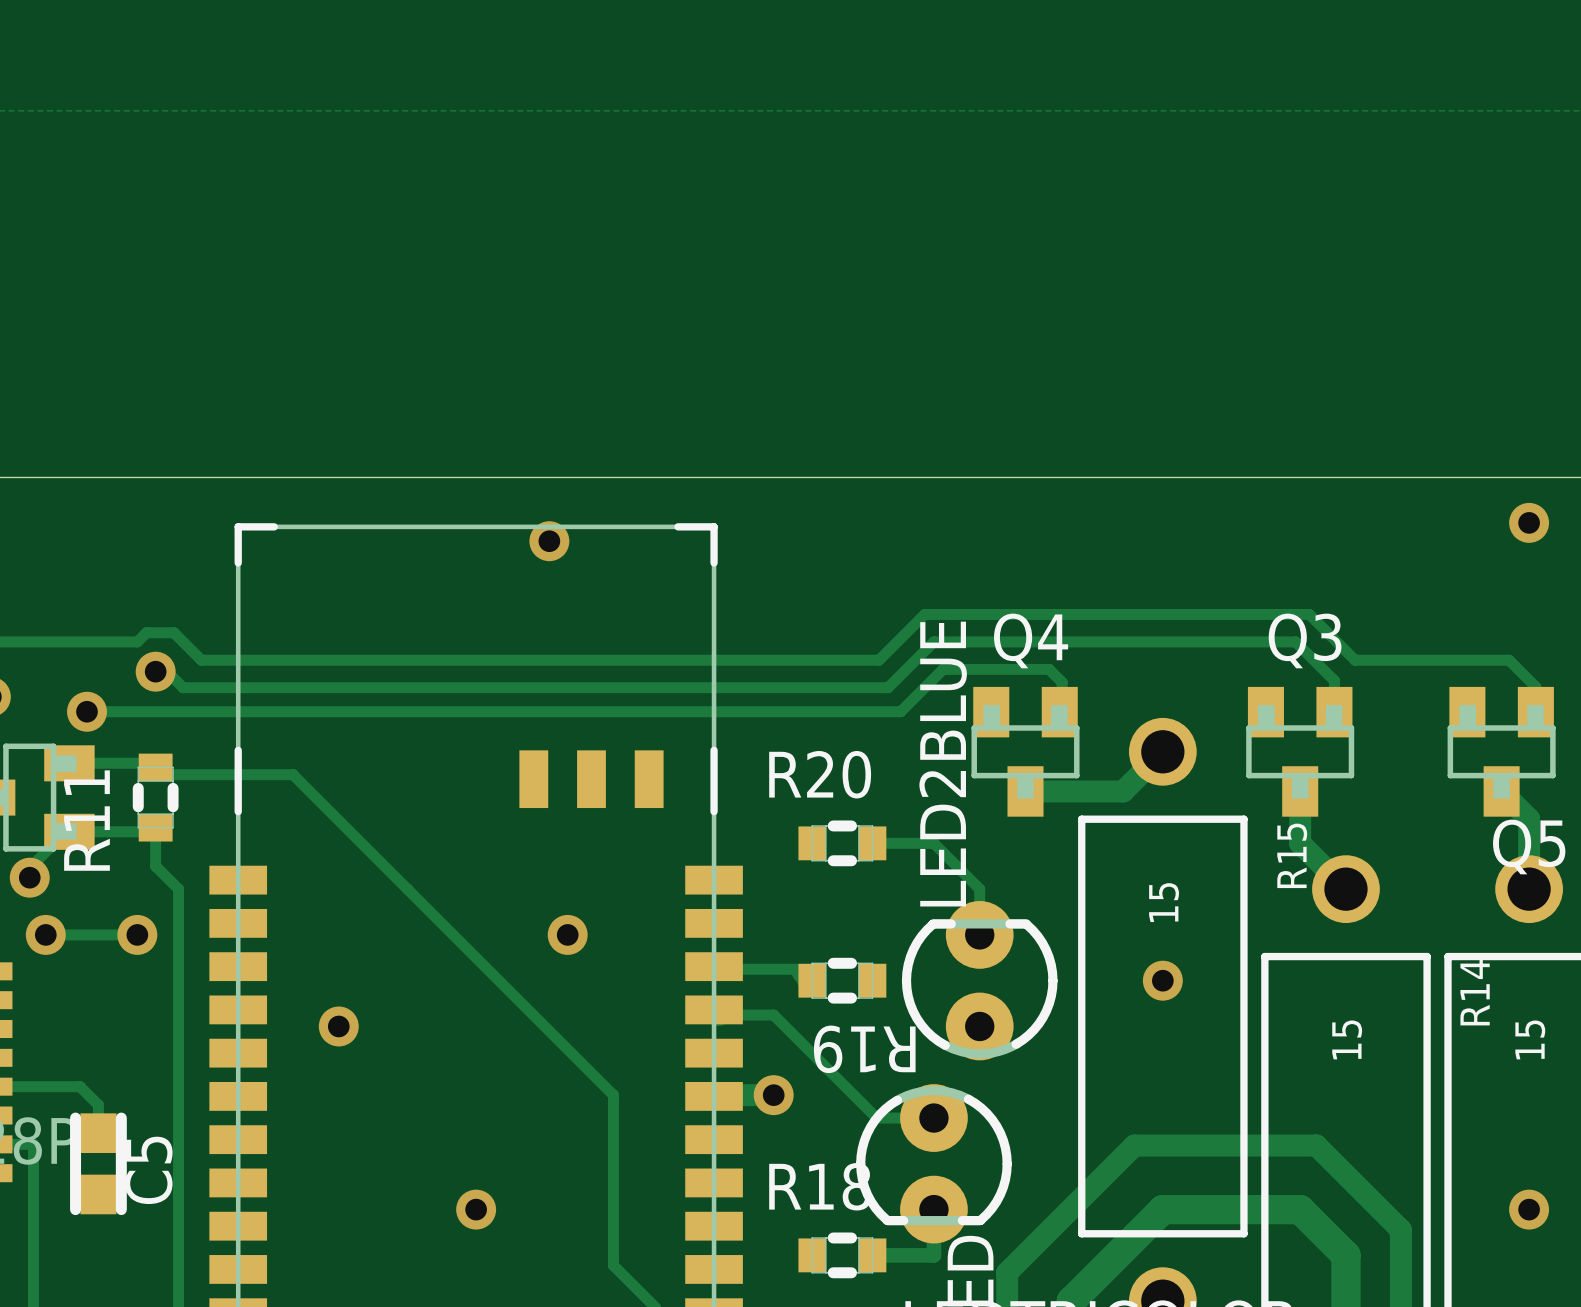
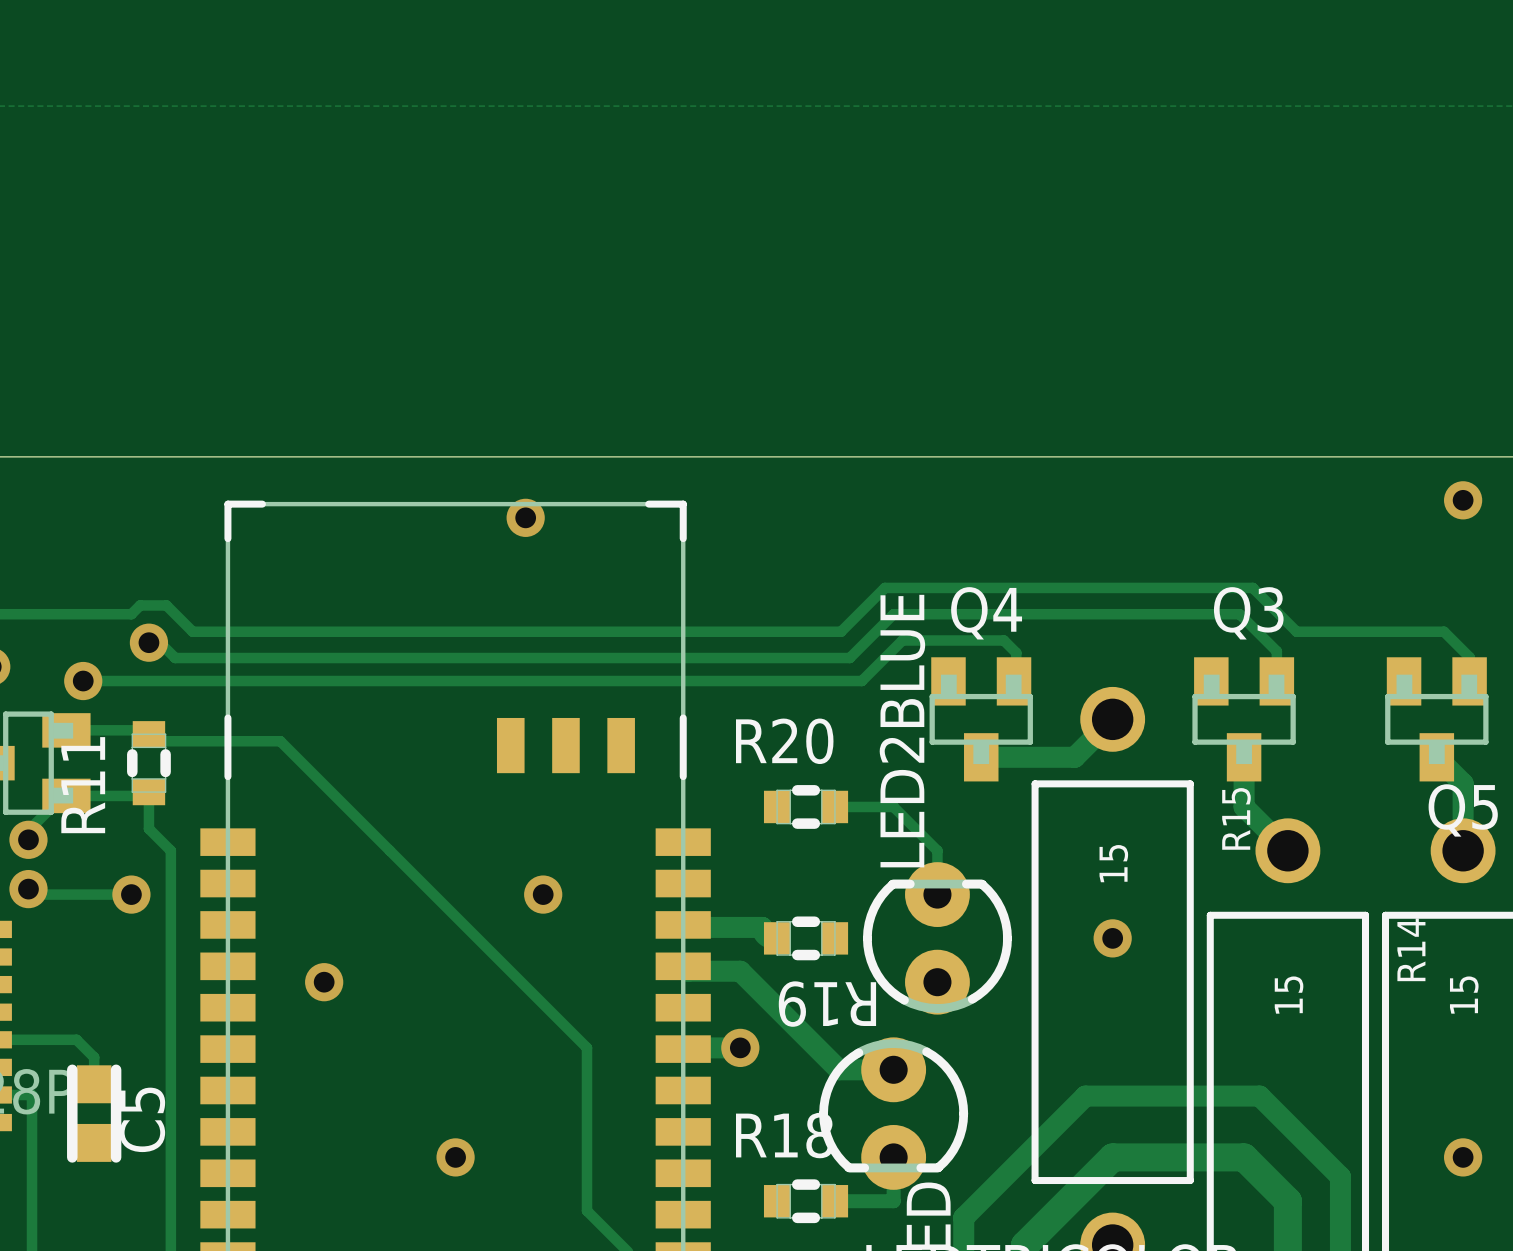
via position: (45, 934) -> (28, 889)
track width: thin (716, 969) (796, 969) (799, 977) (808, 980) -> thick (685, 927) (762, 927) (765, 935) (773, 938)
track width: thin (719, 1015) (773, 1015) (876, 1118) (933, 1118) -> thick (688, 971) (740, 971) (838, 1069) (893, 1069)

